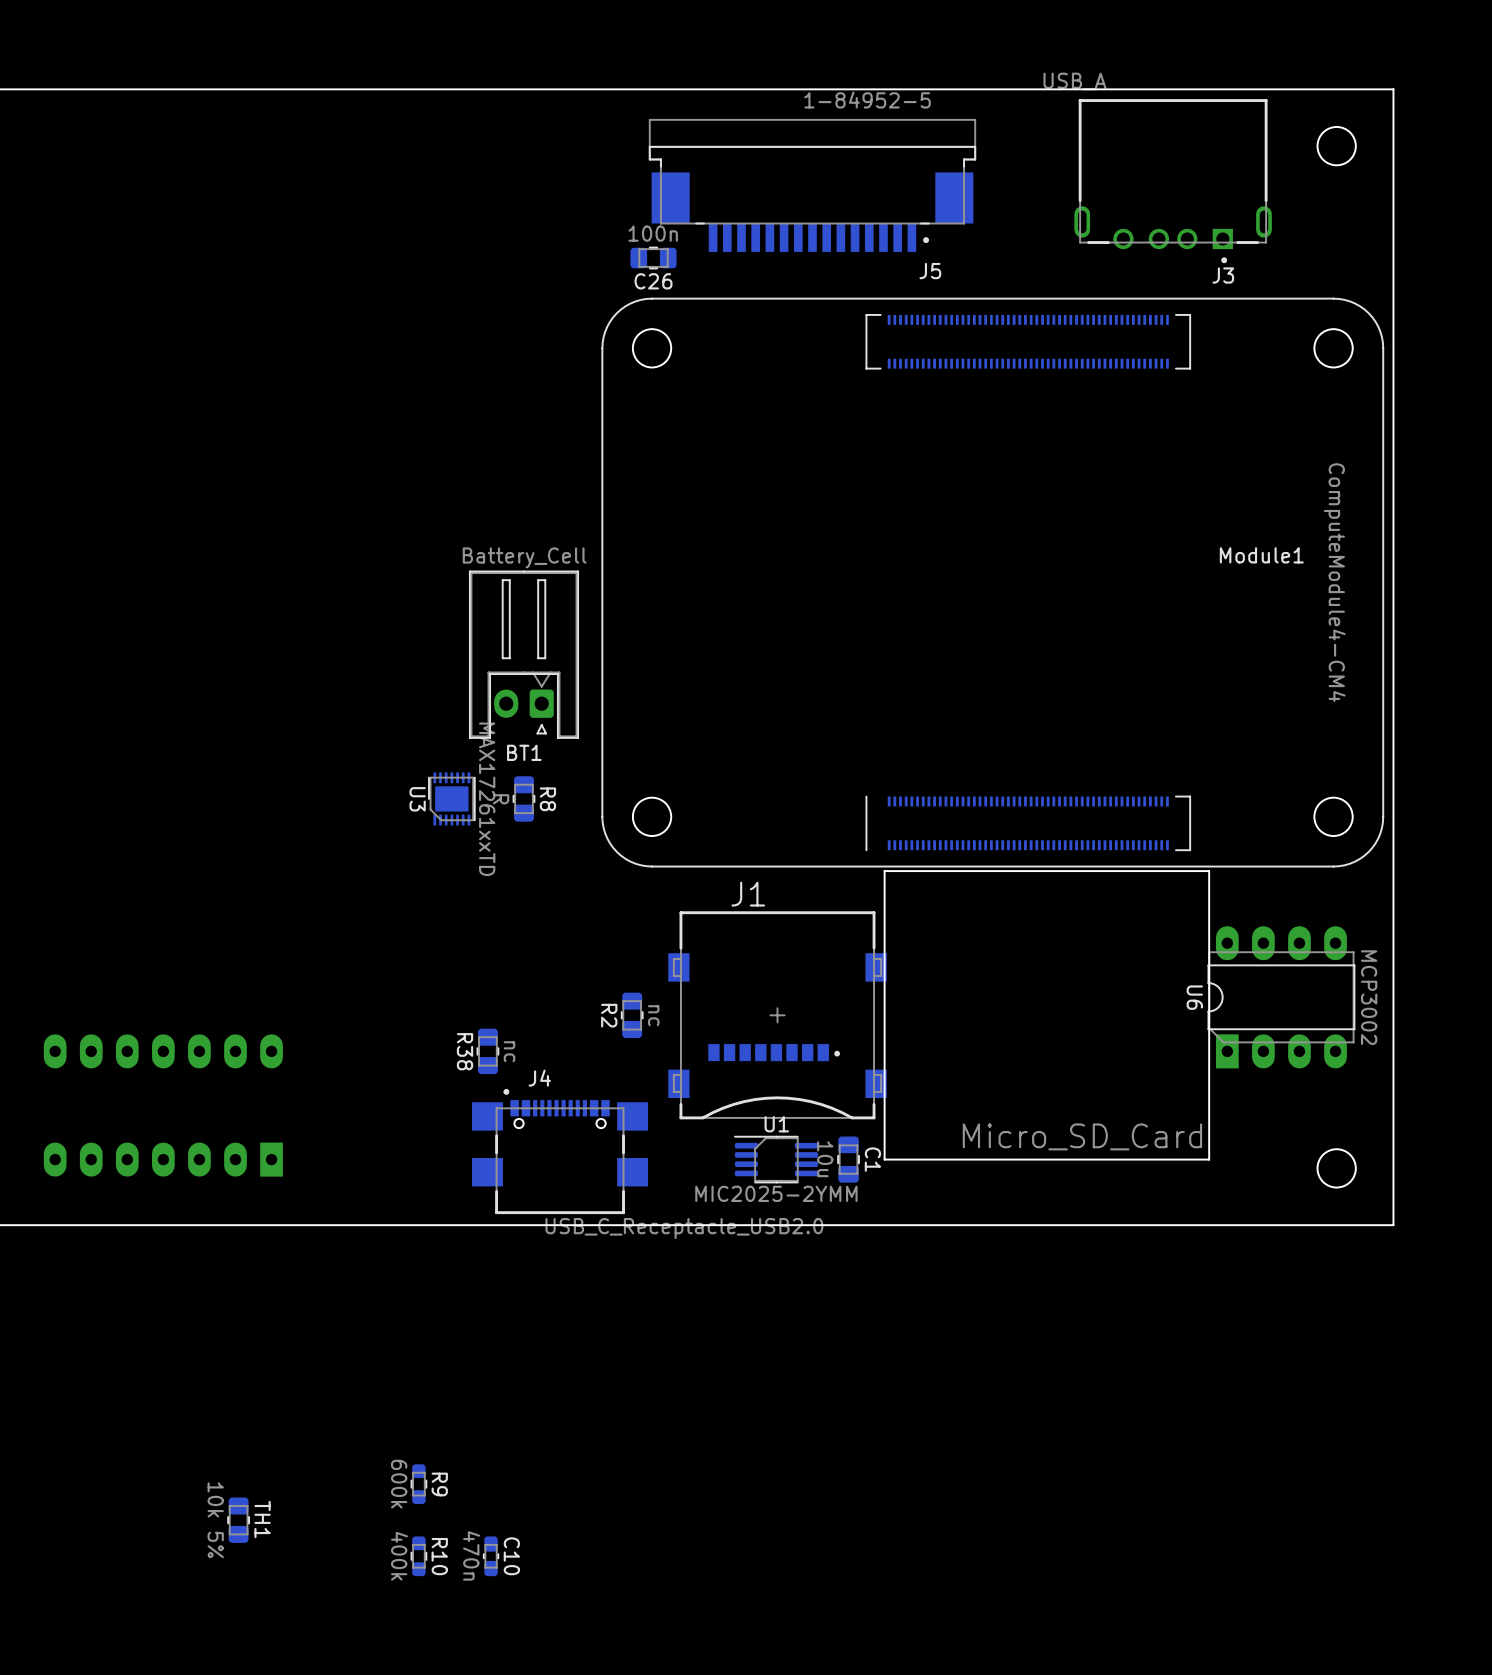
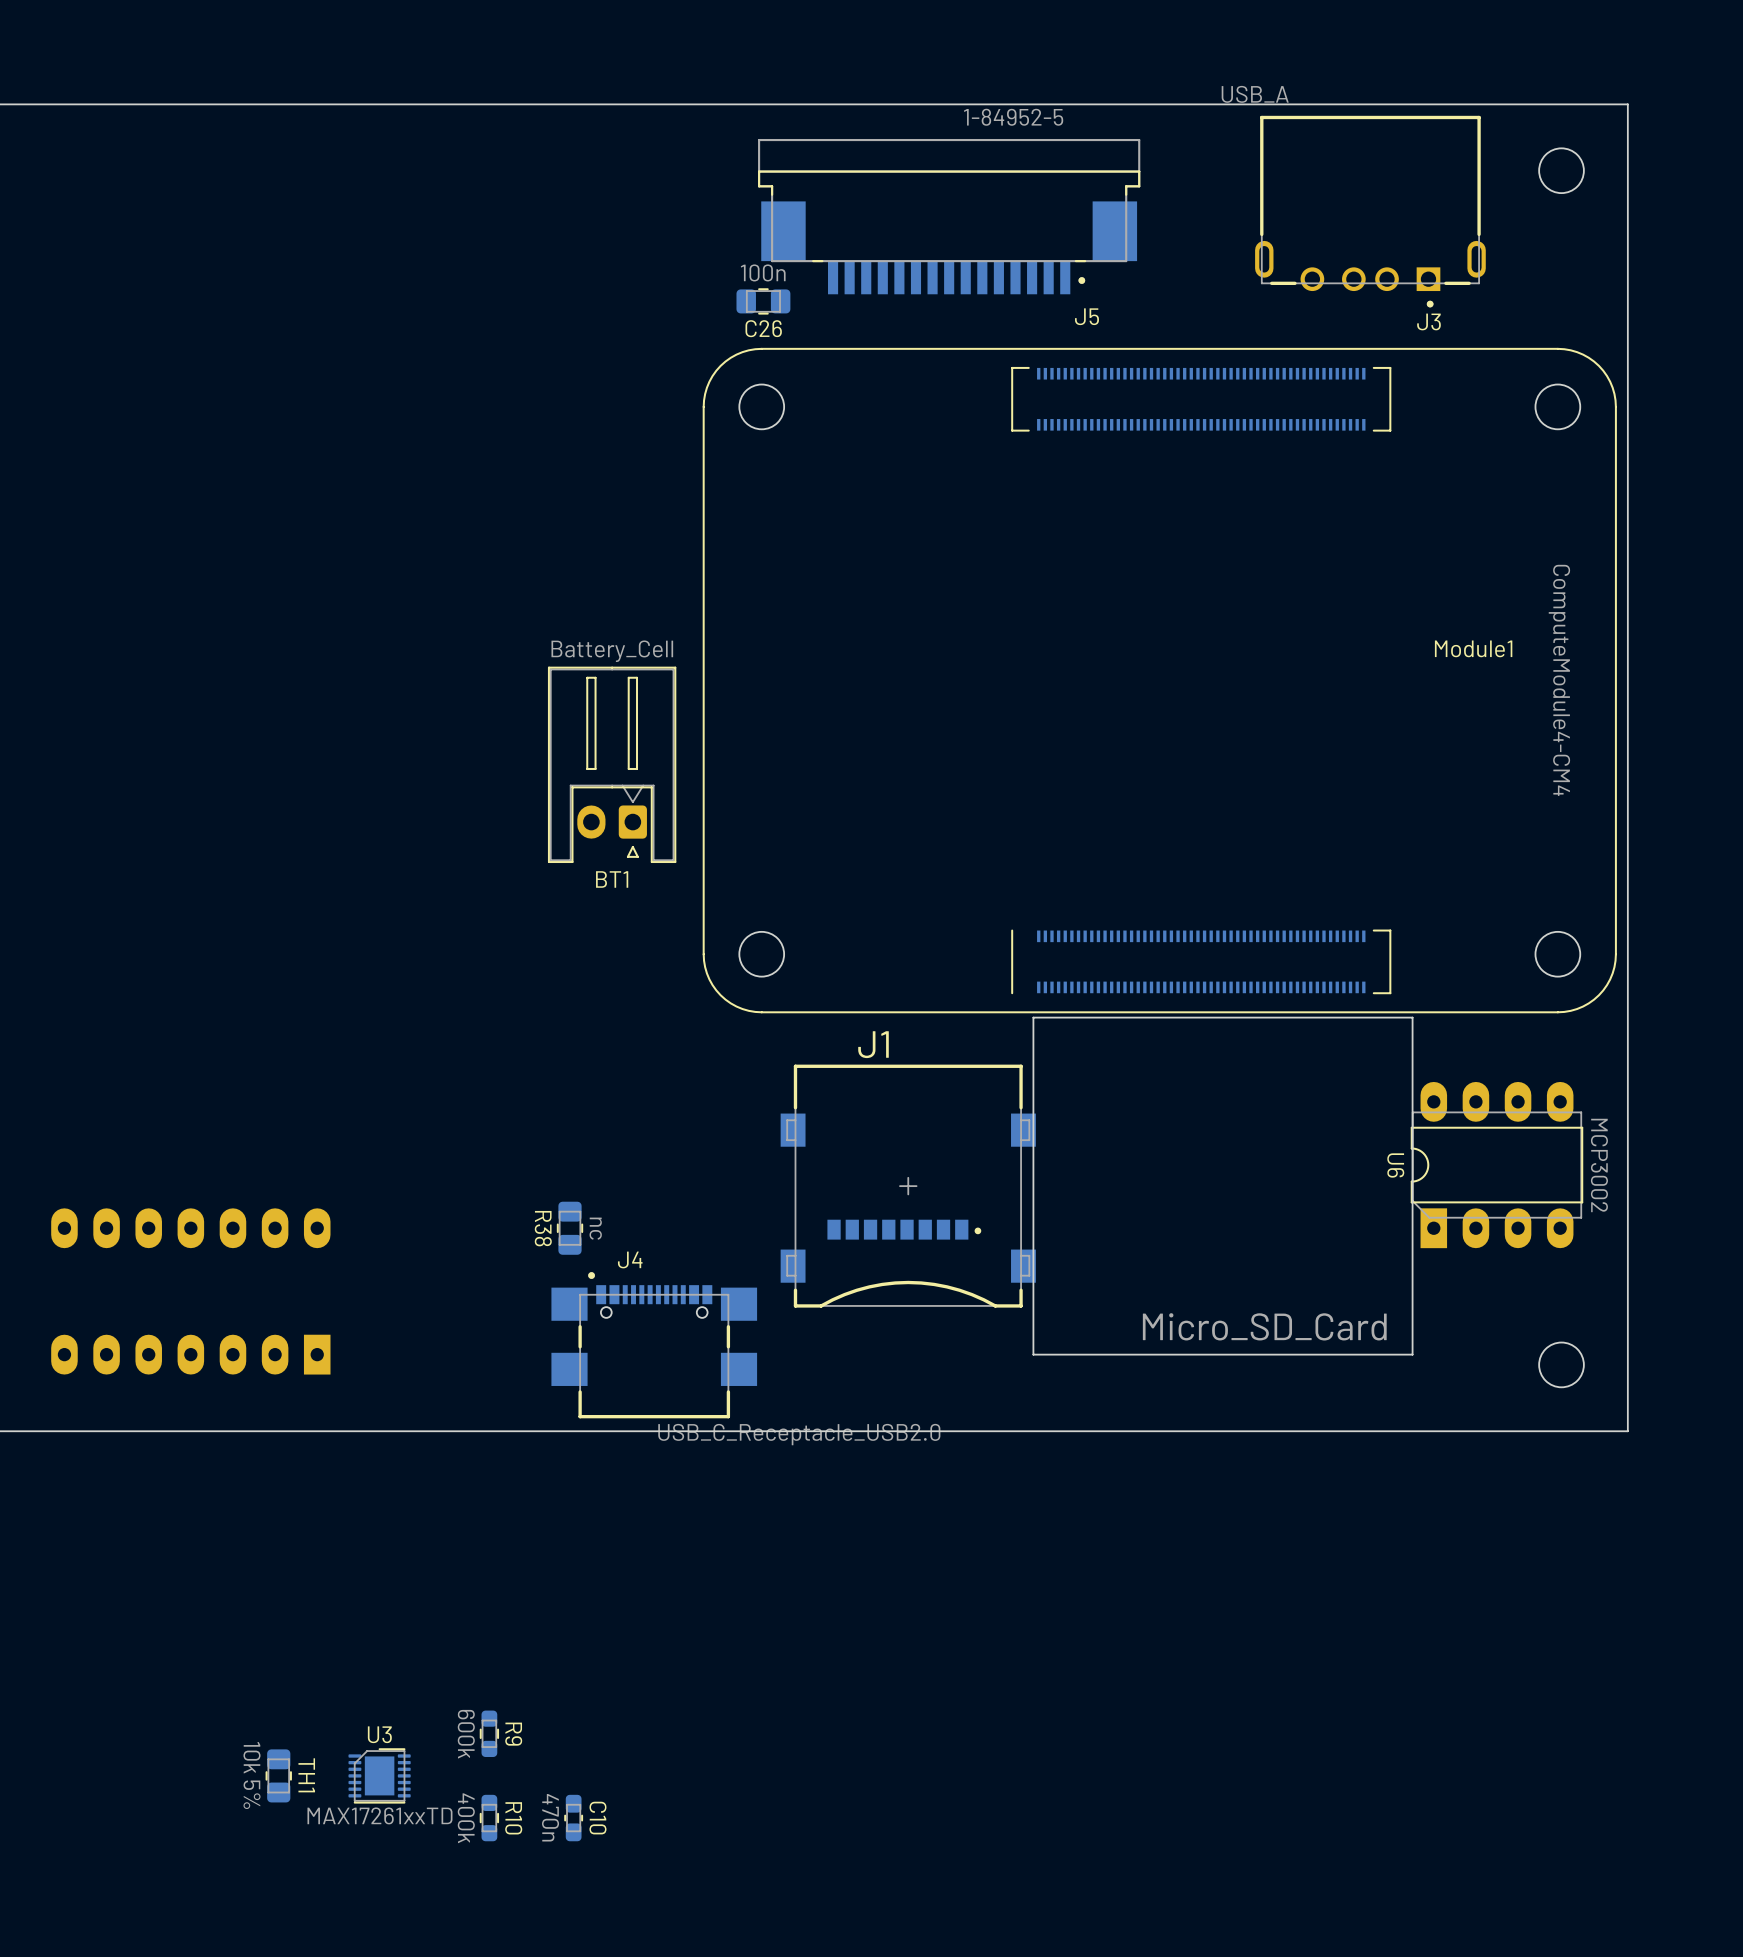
U3 rotation: 0° (451, 798) -> 90° clockwise (379, 1775)
U3 position: (451, 798) -> (379, 1775)
R8: R (523, 798) -> none
R2: nc (632, 1015) -> none
U1: MIC2025-2YMM (776, 1159) -> none
C1: 10u (848, 1159) -> none

